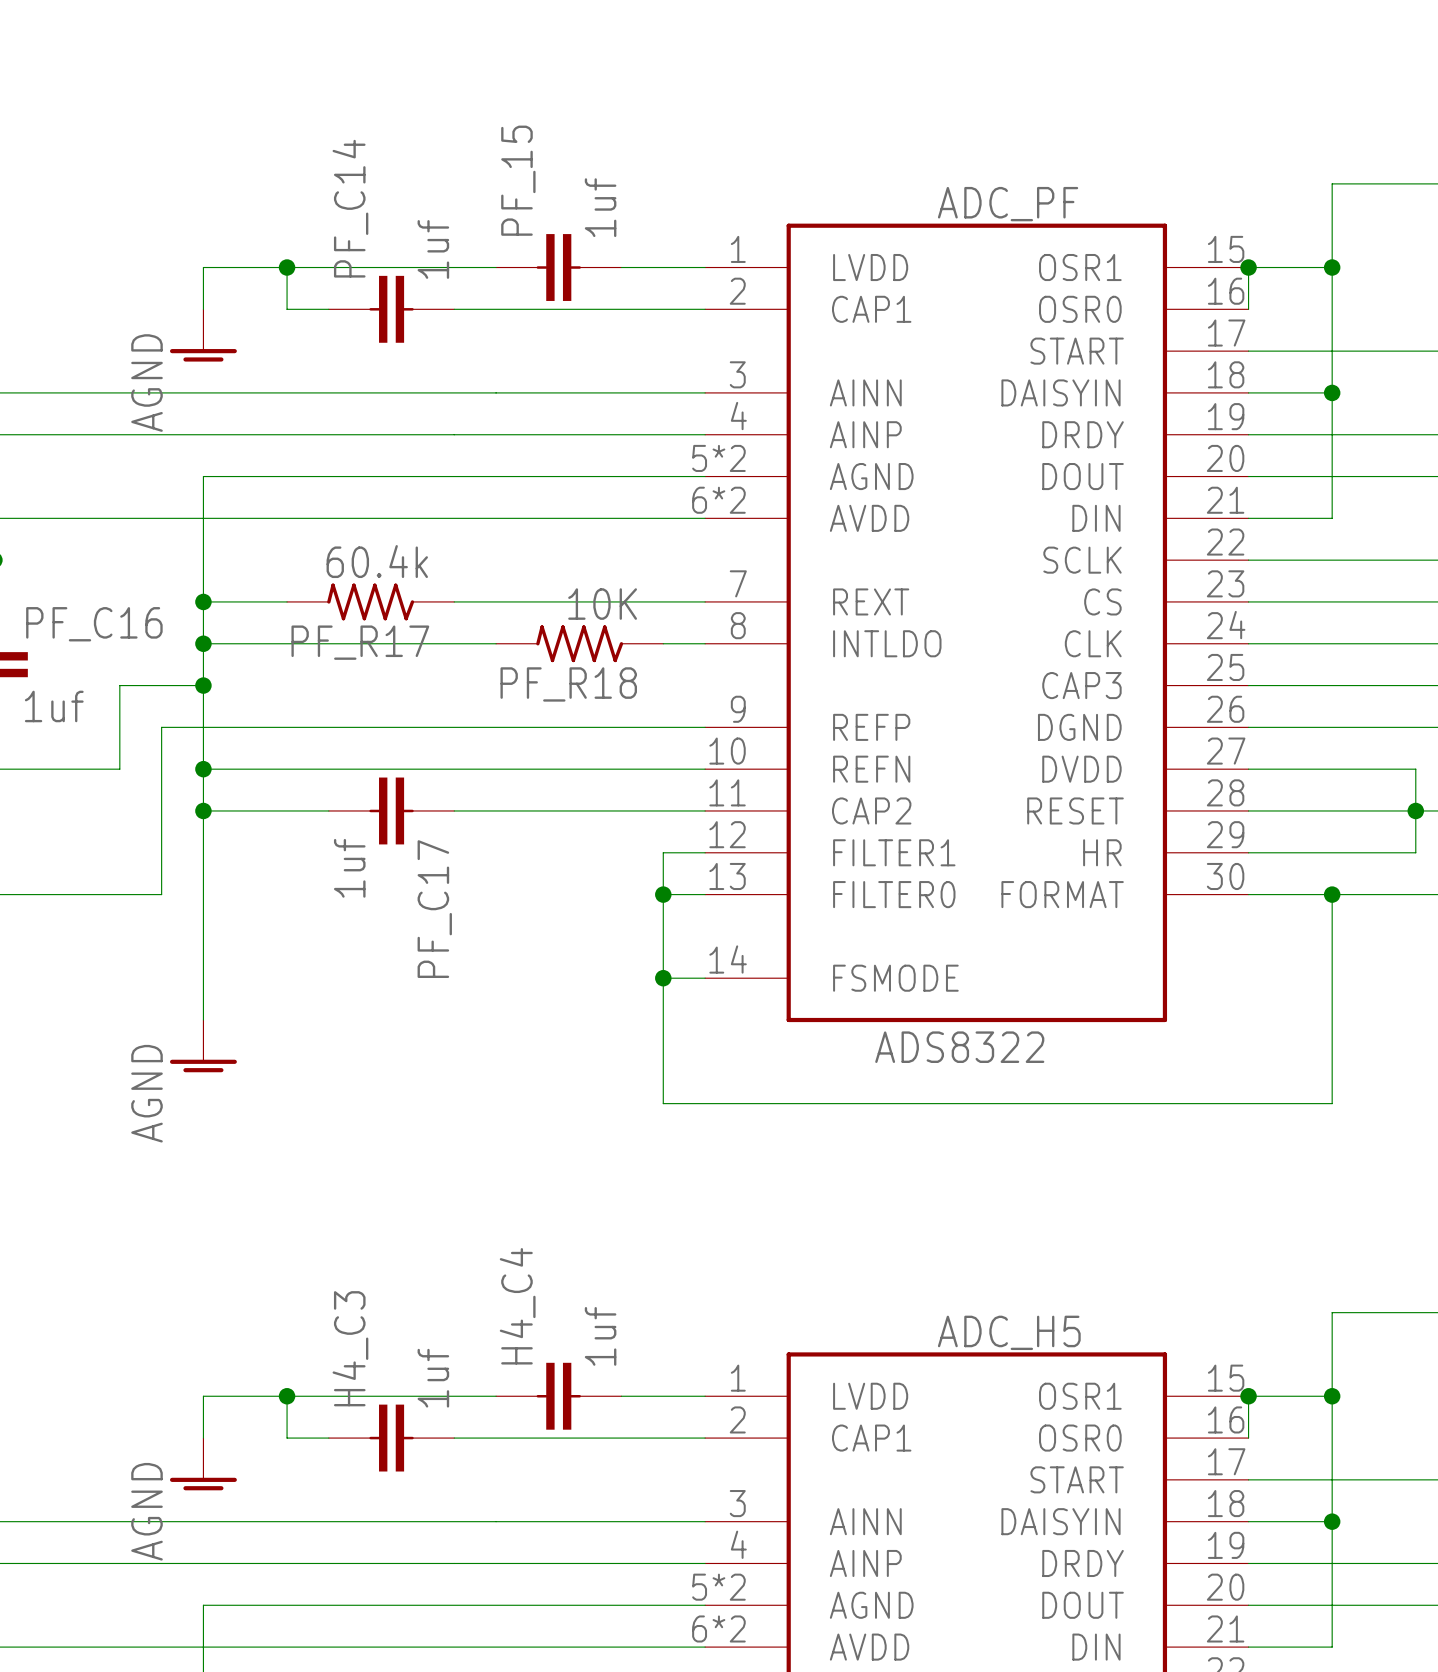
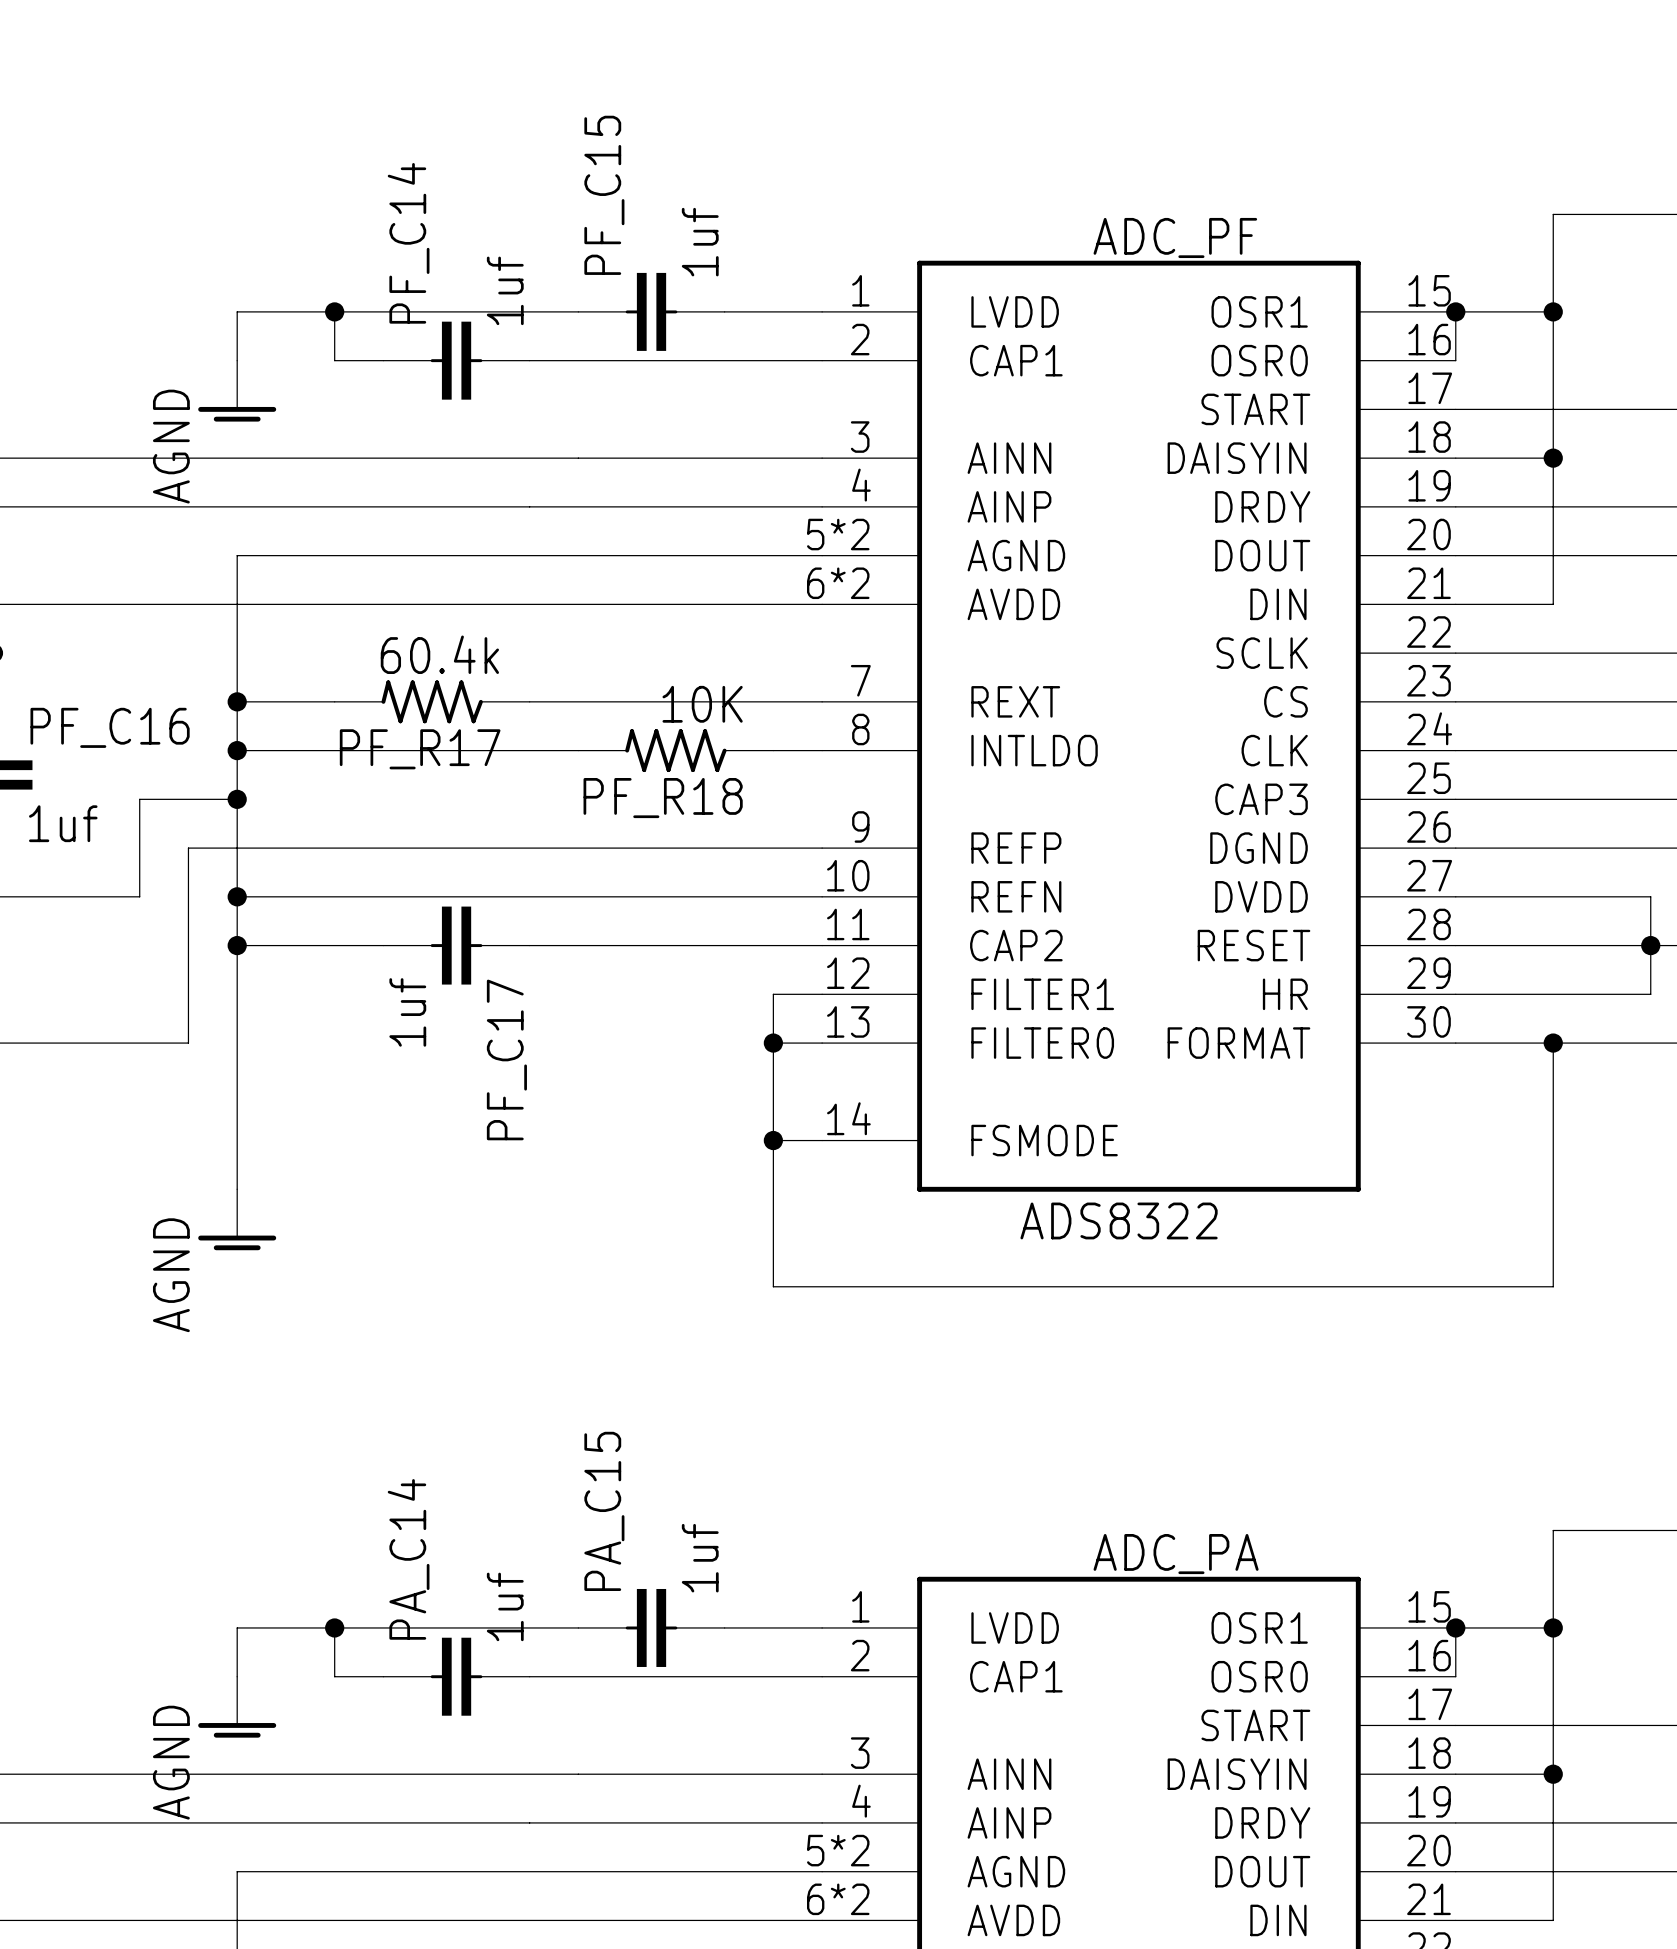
PF_15 name: PF_15 (518, 180) -> PF_C15 (604, 195)
H4_C4 name: H4_C4 (517, 1306) -> PA_C15 (604, 1511)
ADC_H5 name: ADC_H5 (1009, 1332) -> ADC_PA (1176, 1554)
H4_C3 name: H4_C3 (350, 1348) -> PA_C14 (408, 1559)

